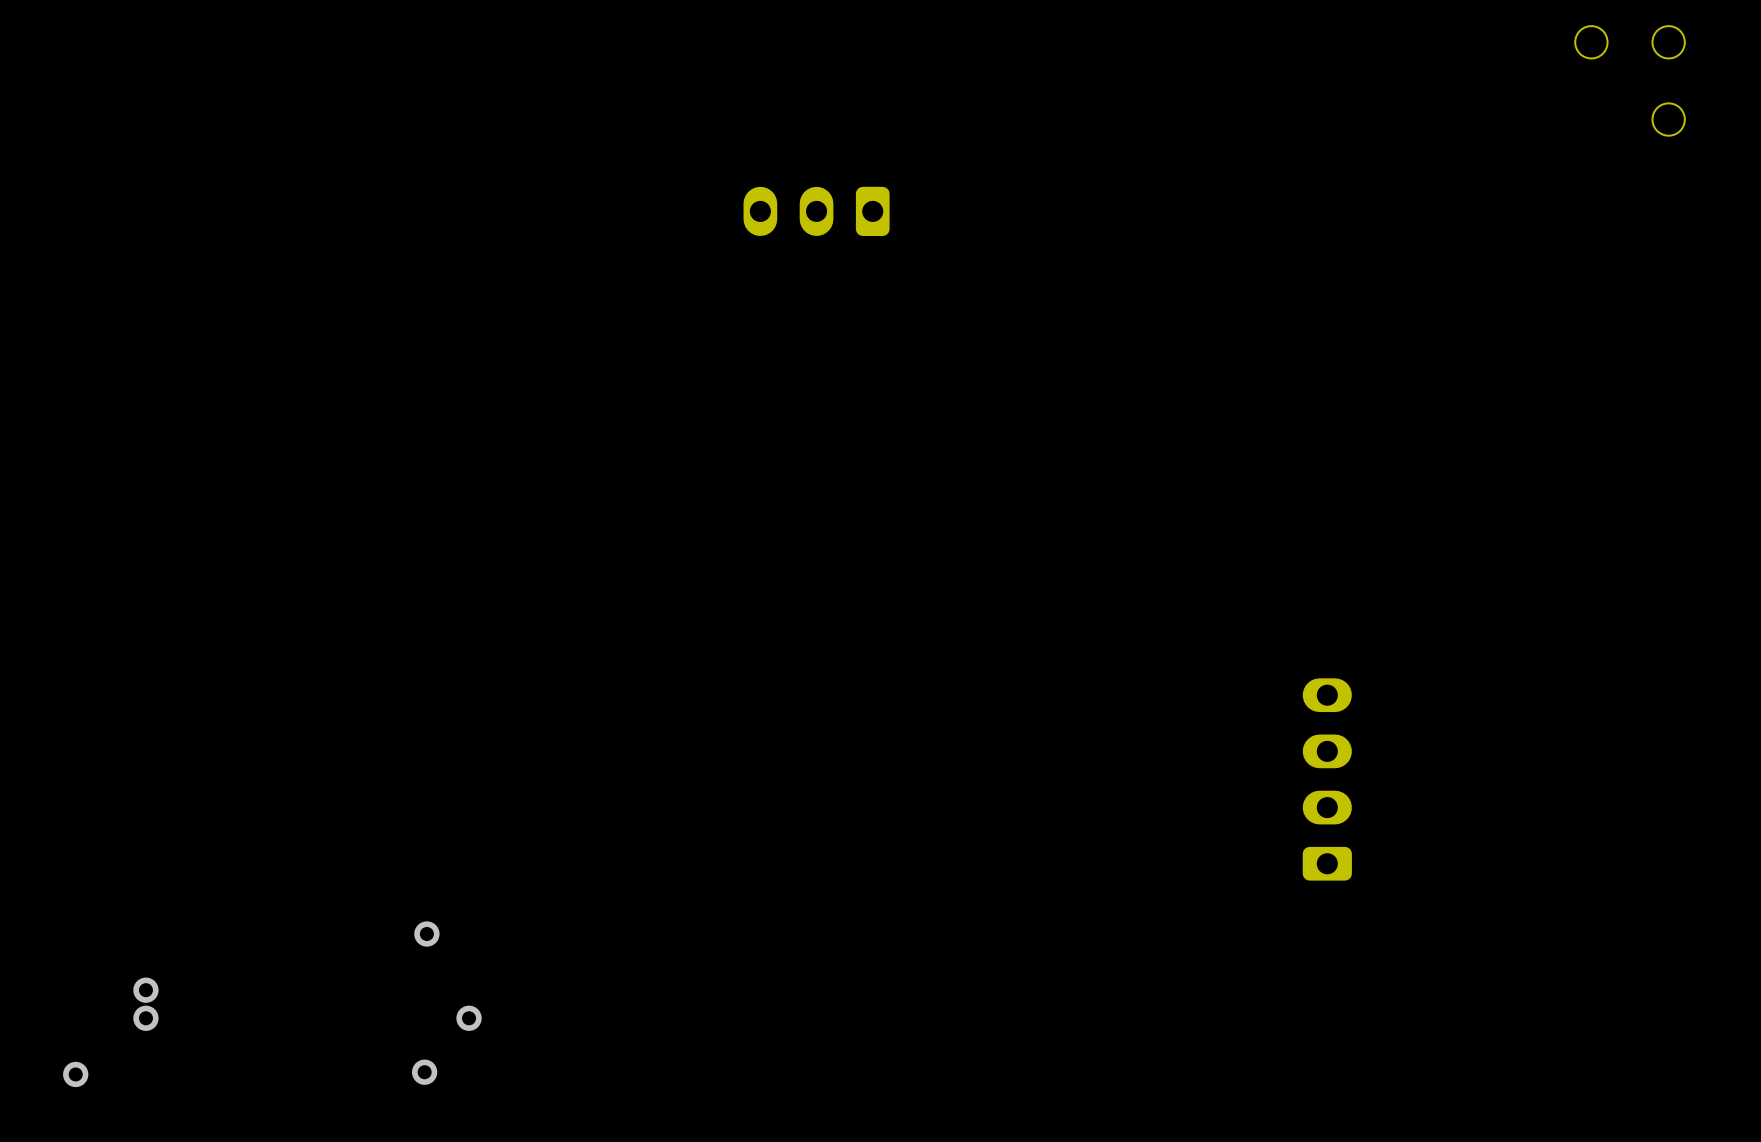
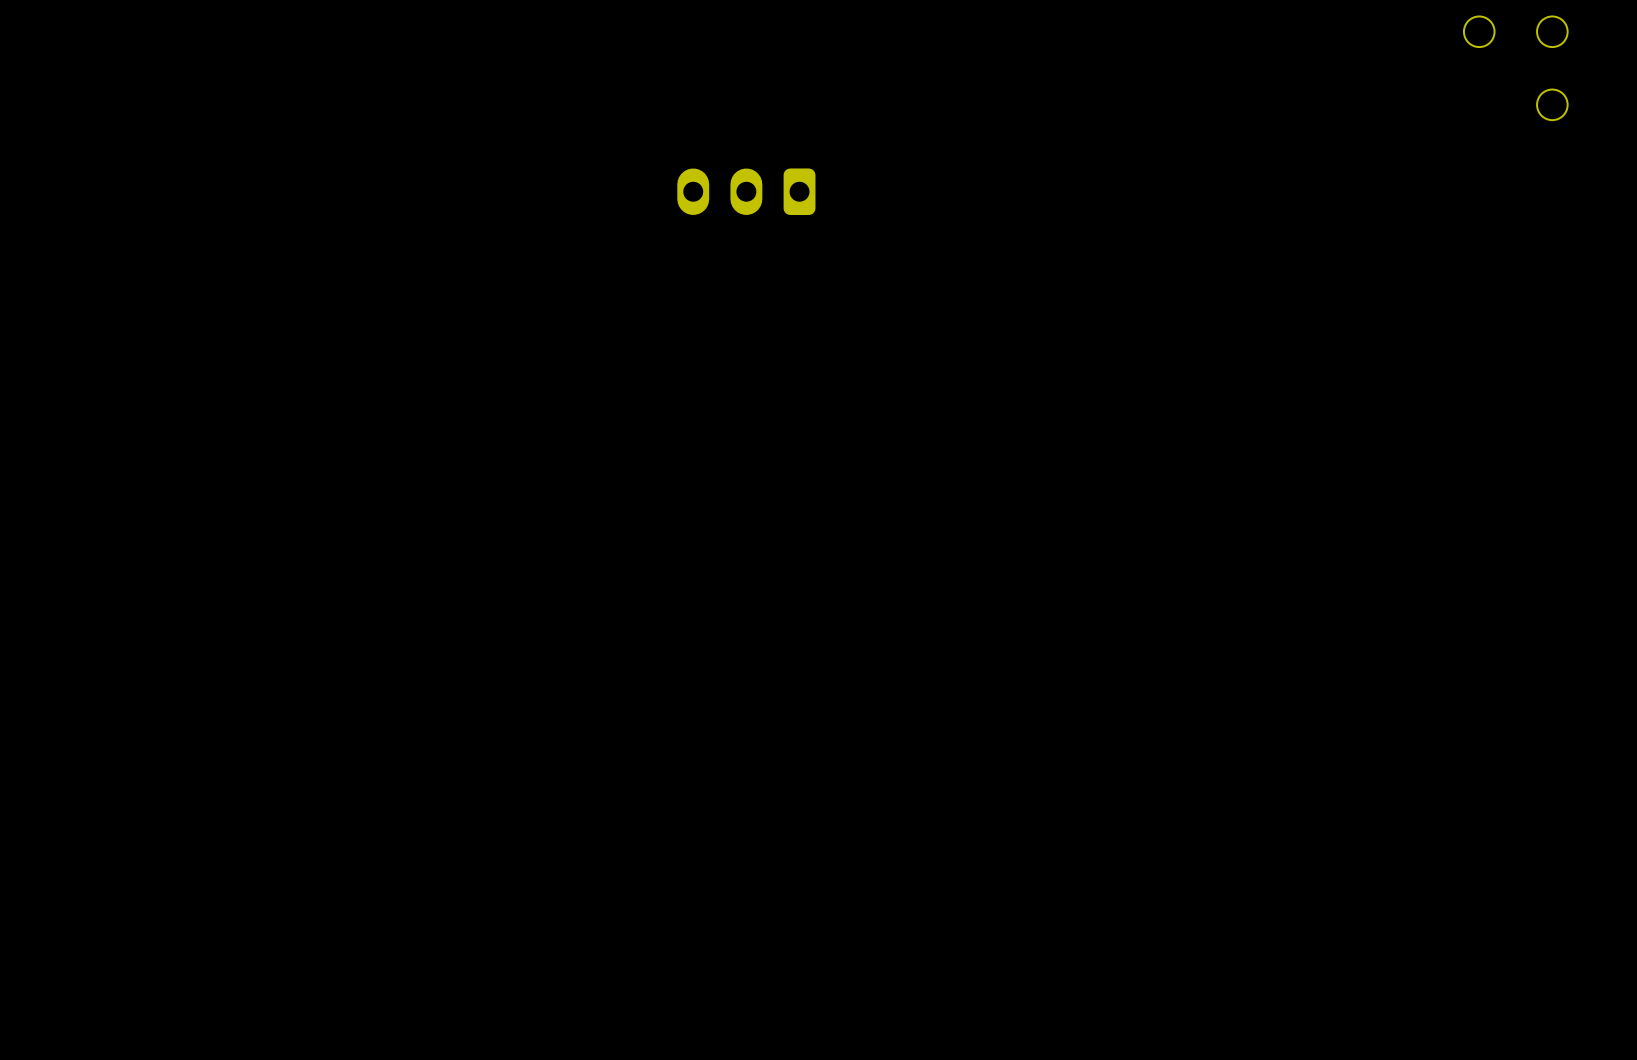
part: (1327, 779) -> none
via: (426, 933) -> none
via: (145, 990) -> none
via: (145, 1018) -> none
via: (469, 1018) -> none
via: (424, 1072) -> none
via: (75, 1074) -> none

